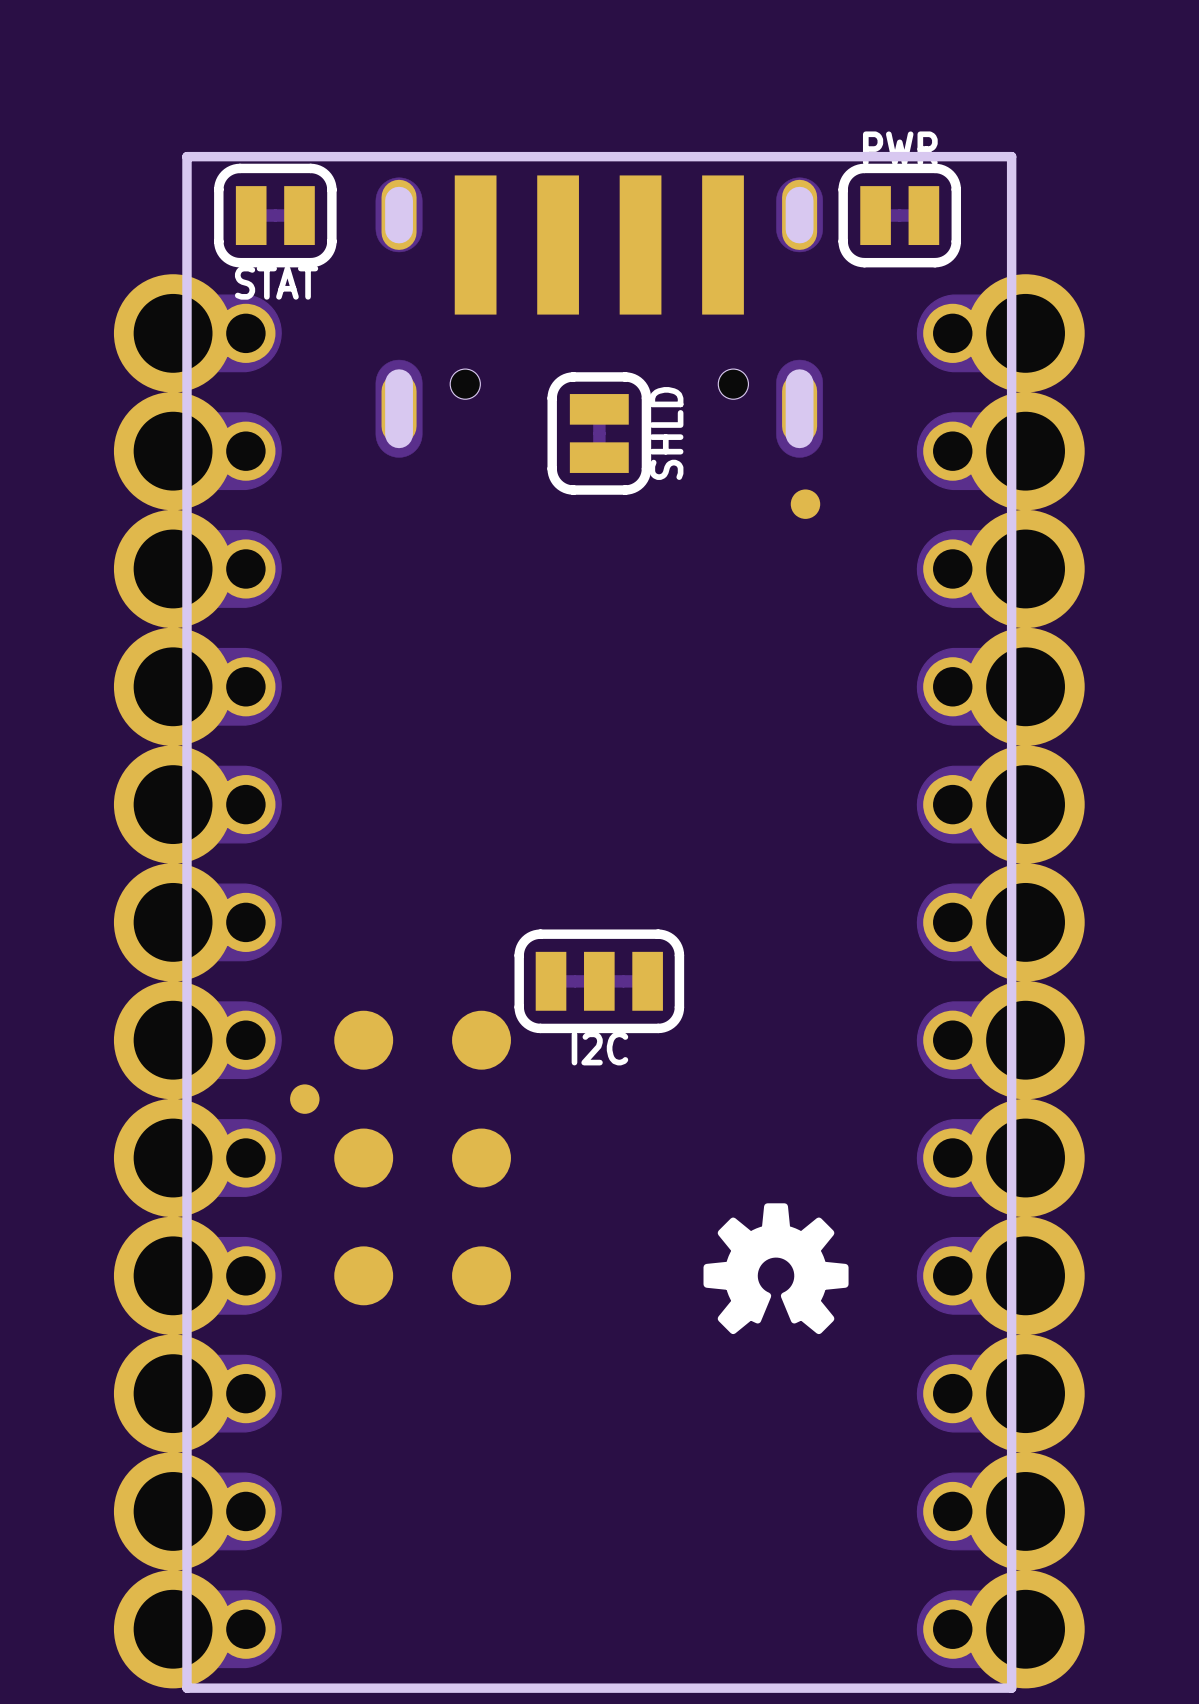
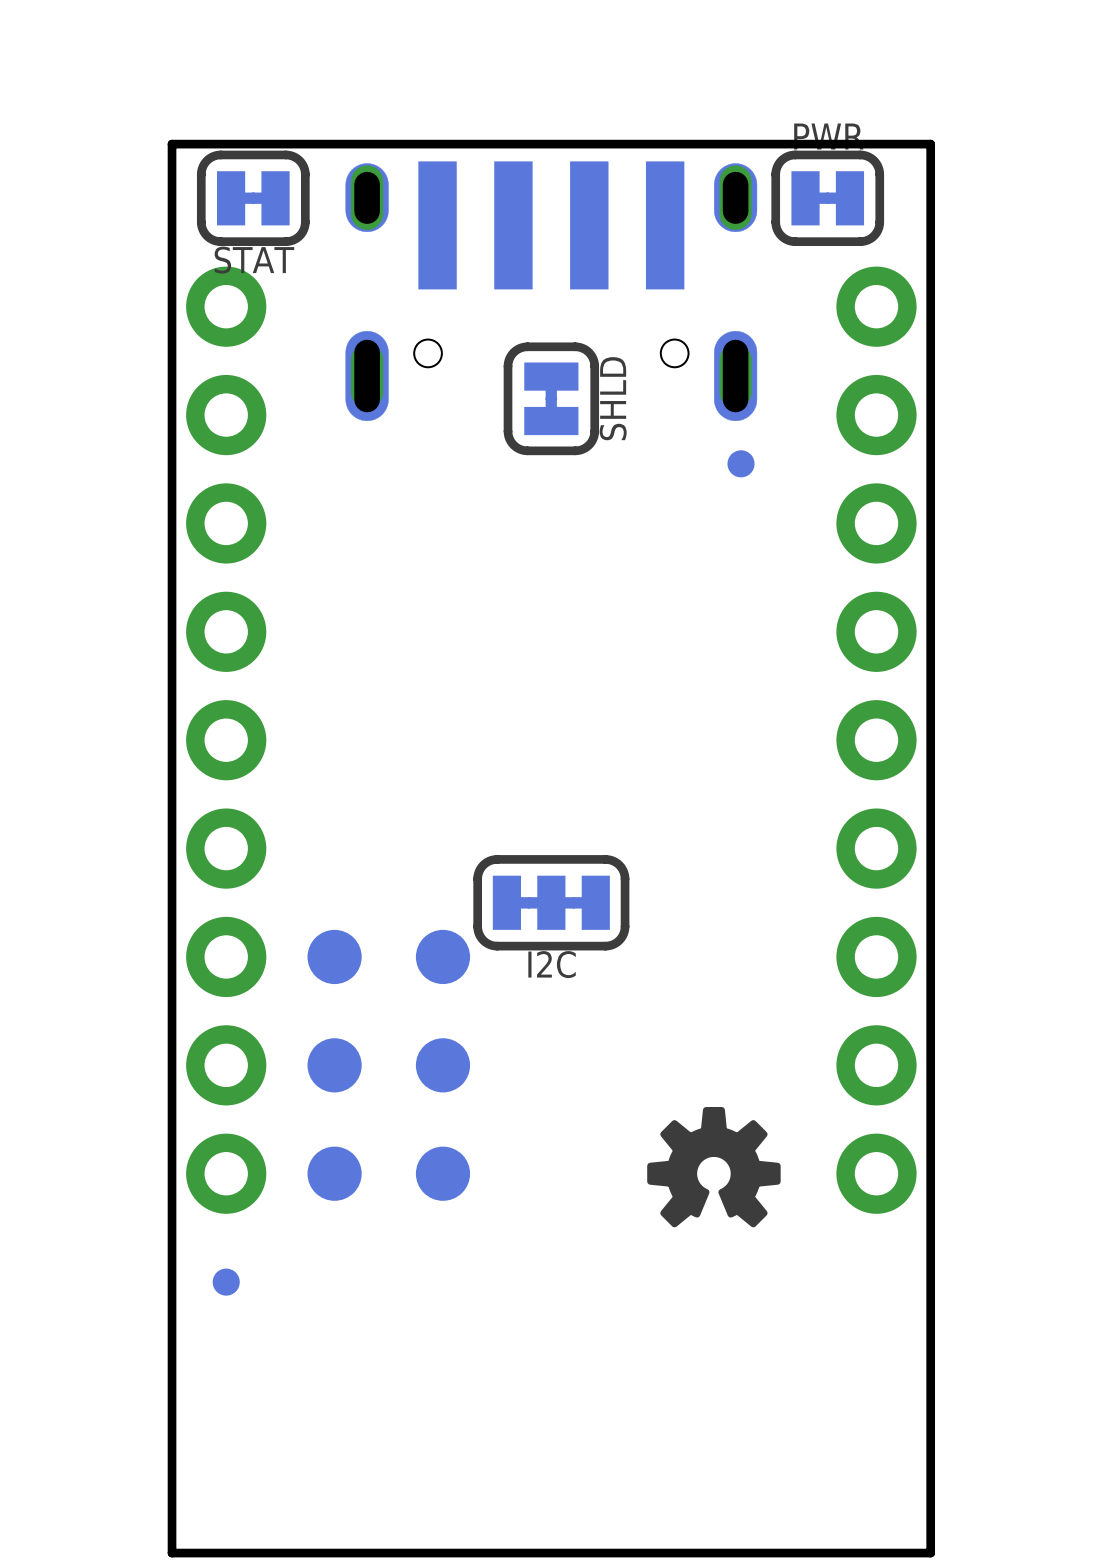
part: none -> (226, 740)
part: none -> (876, 740)
part: (197, 981) -> none
part: (1000, 981) -> none
part position: (304, 1099) -> (226, 1282)

